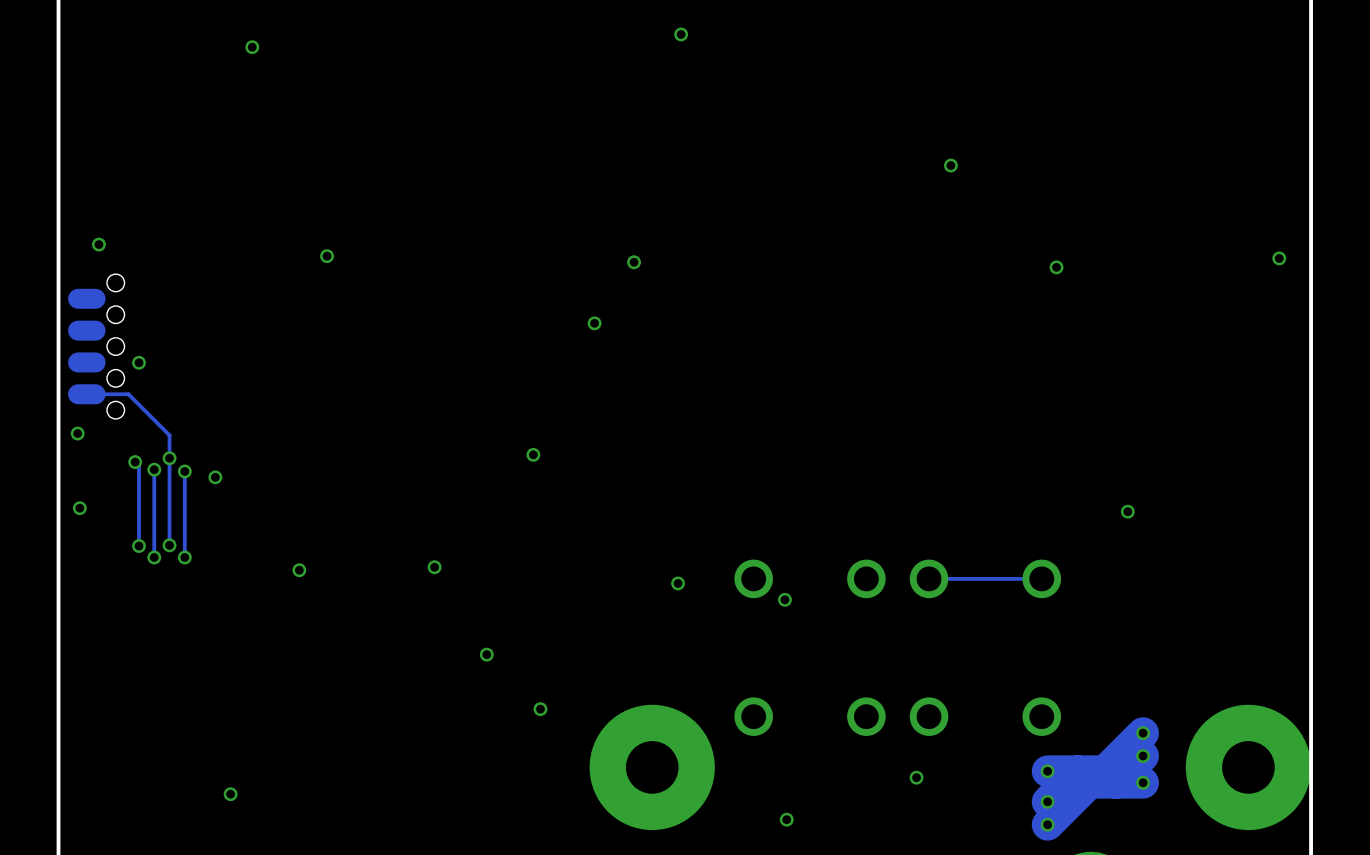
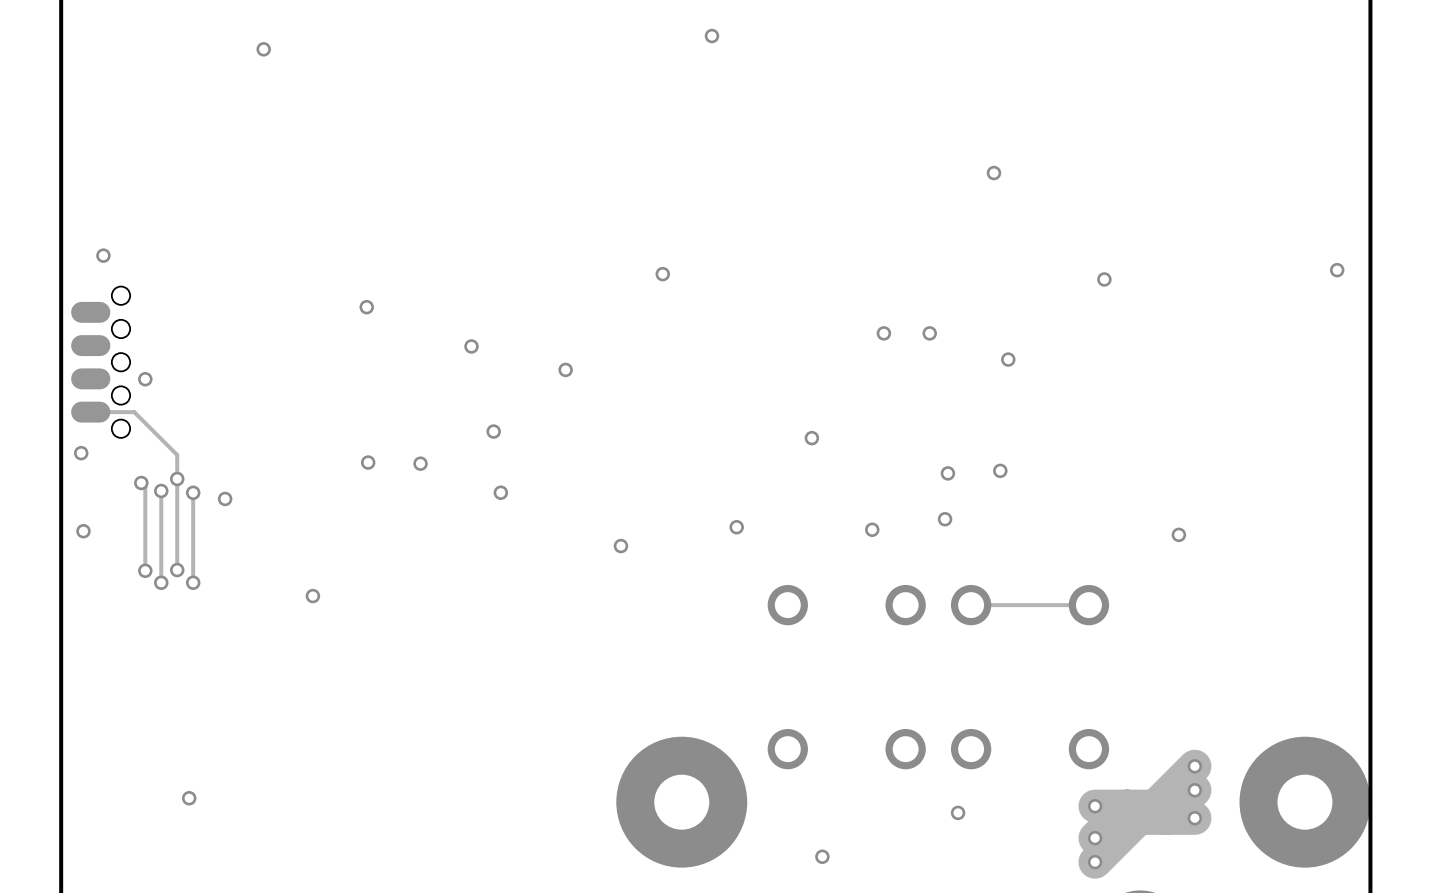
via position: (327, 256) -> (366, 307)
via: none -> (883, 333)
via: none -> (929, 333)
via: (594, 323) -> none
via: none -> (471, 346)
via: none -> (1008, 359)
via: none -> (565, 369)
via: none -> (493, 431)
via: none -> (811, 438)
via: none -> (368, 462)
via: none -> (420, 463)
via: none -> (1000, 470)
via: none -> (947, 473)
via: (533, 454) -> none
via: none -> (500, 492)
via: none -> (945, 519)
via: none -> (736, 527)
via: none -> (872, 529)
via: none -> (620, 546)
via: (434, 567) -> none
via: (678, 583) -> none
via: (784, 599) -> none
via: (486, 654) -> none
via: (540, 709) -> none
via position: (230, 794) -> (189, 798)

